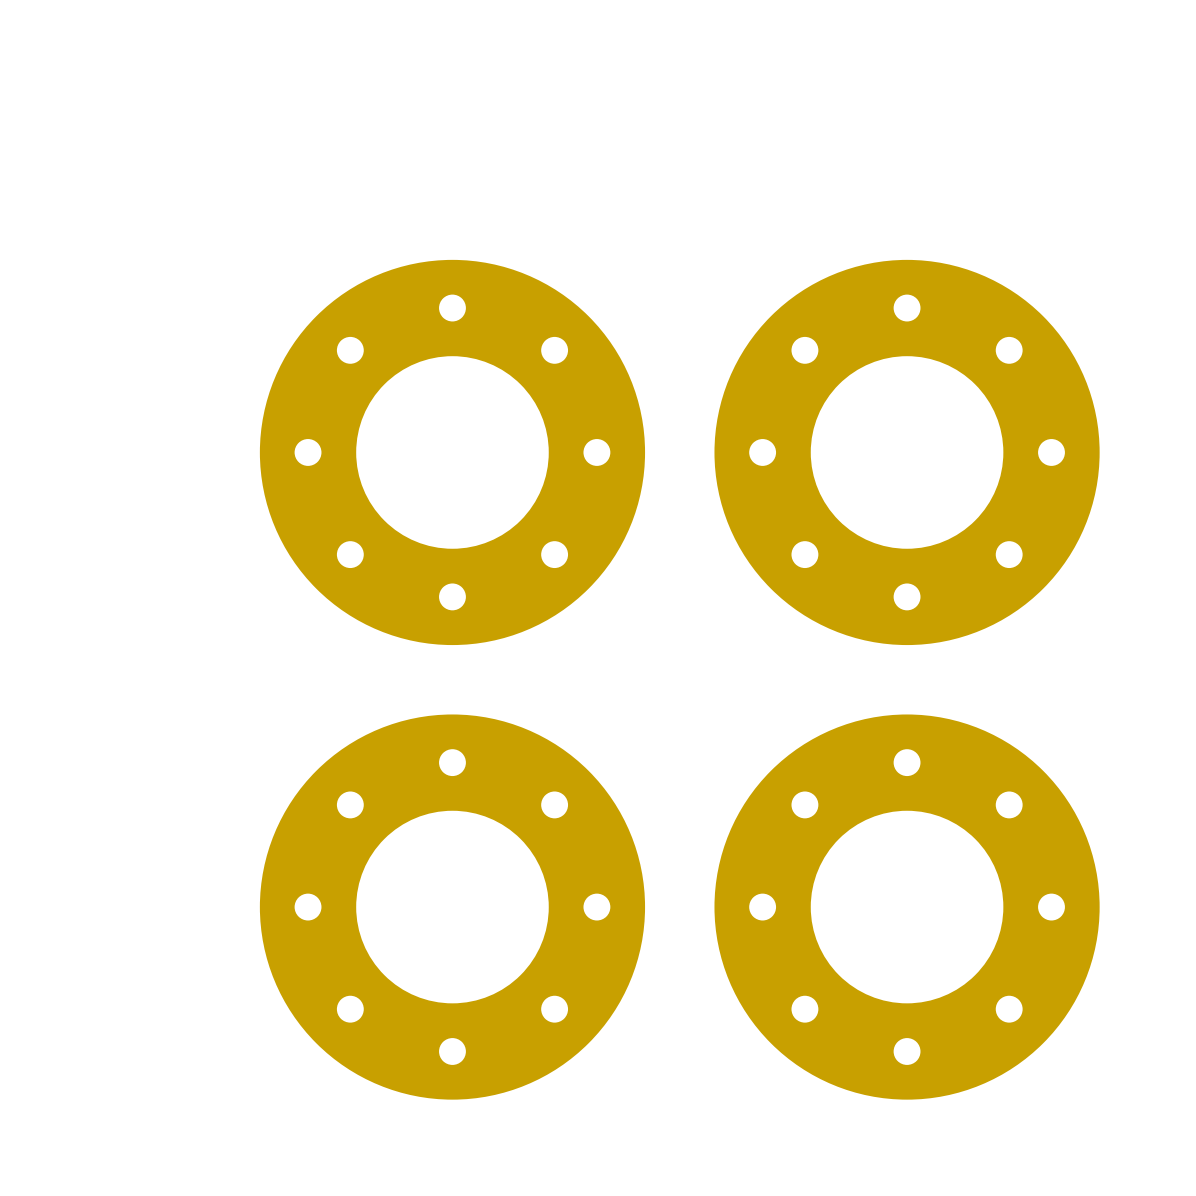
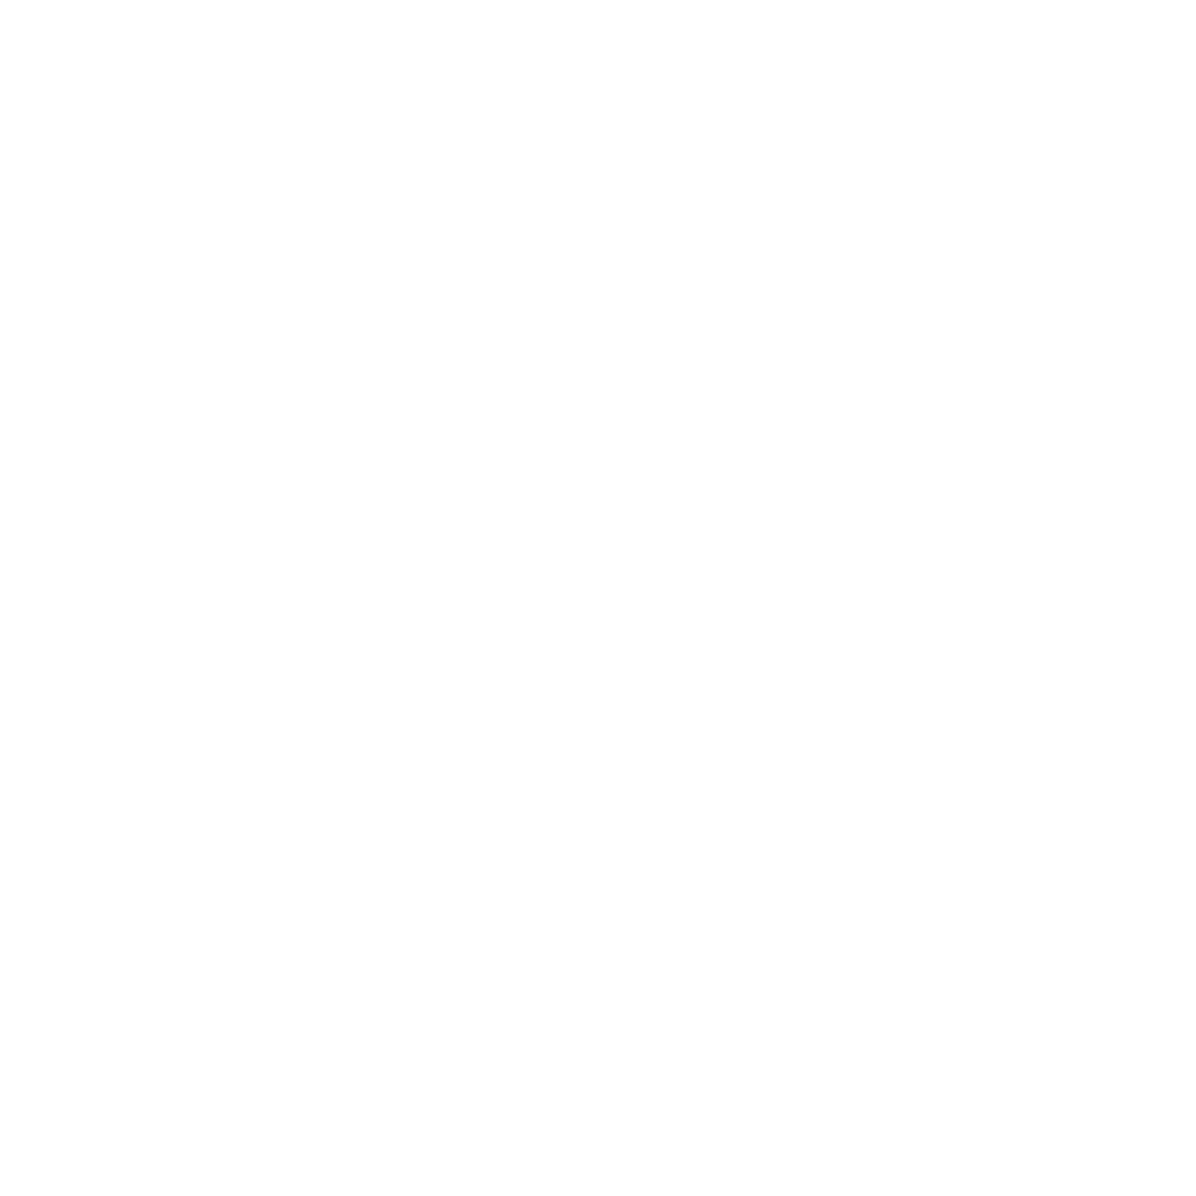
part: (452, 452) -> none
part: (907, 452) -> none
part: (452, 907) -> none
part: (907, 907) -> none

